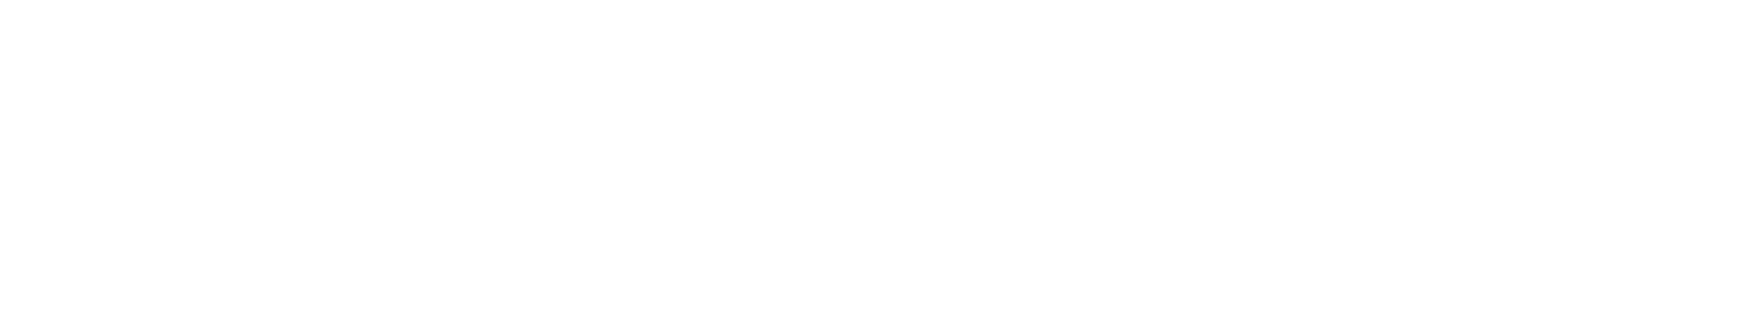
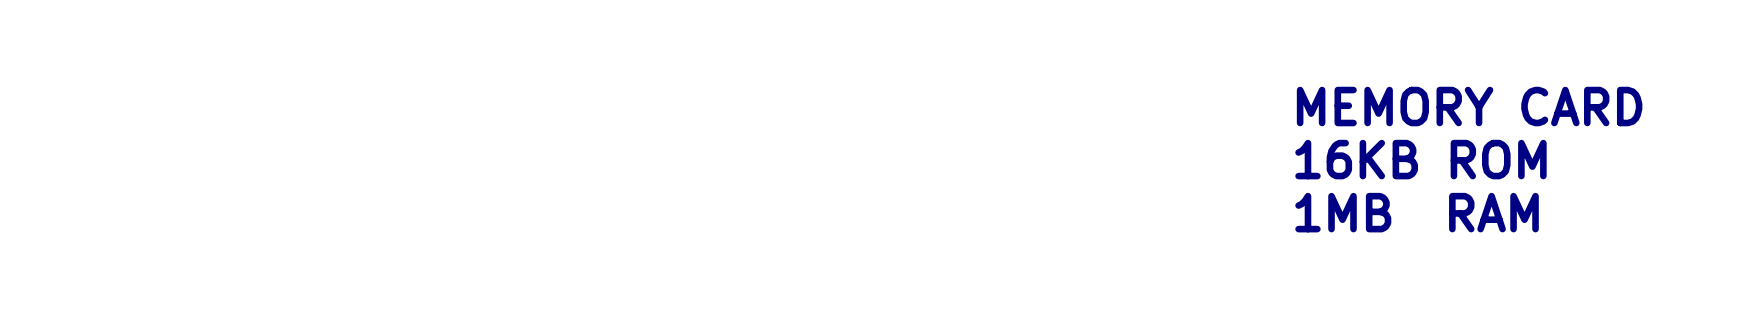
text: none -> MEMORY CARD (1469, 106)
text: none -> 16KB ROM (1420, 159)
text: none -> 1MB RAM (1417, 212)

